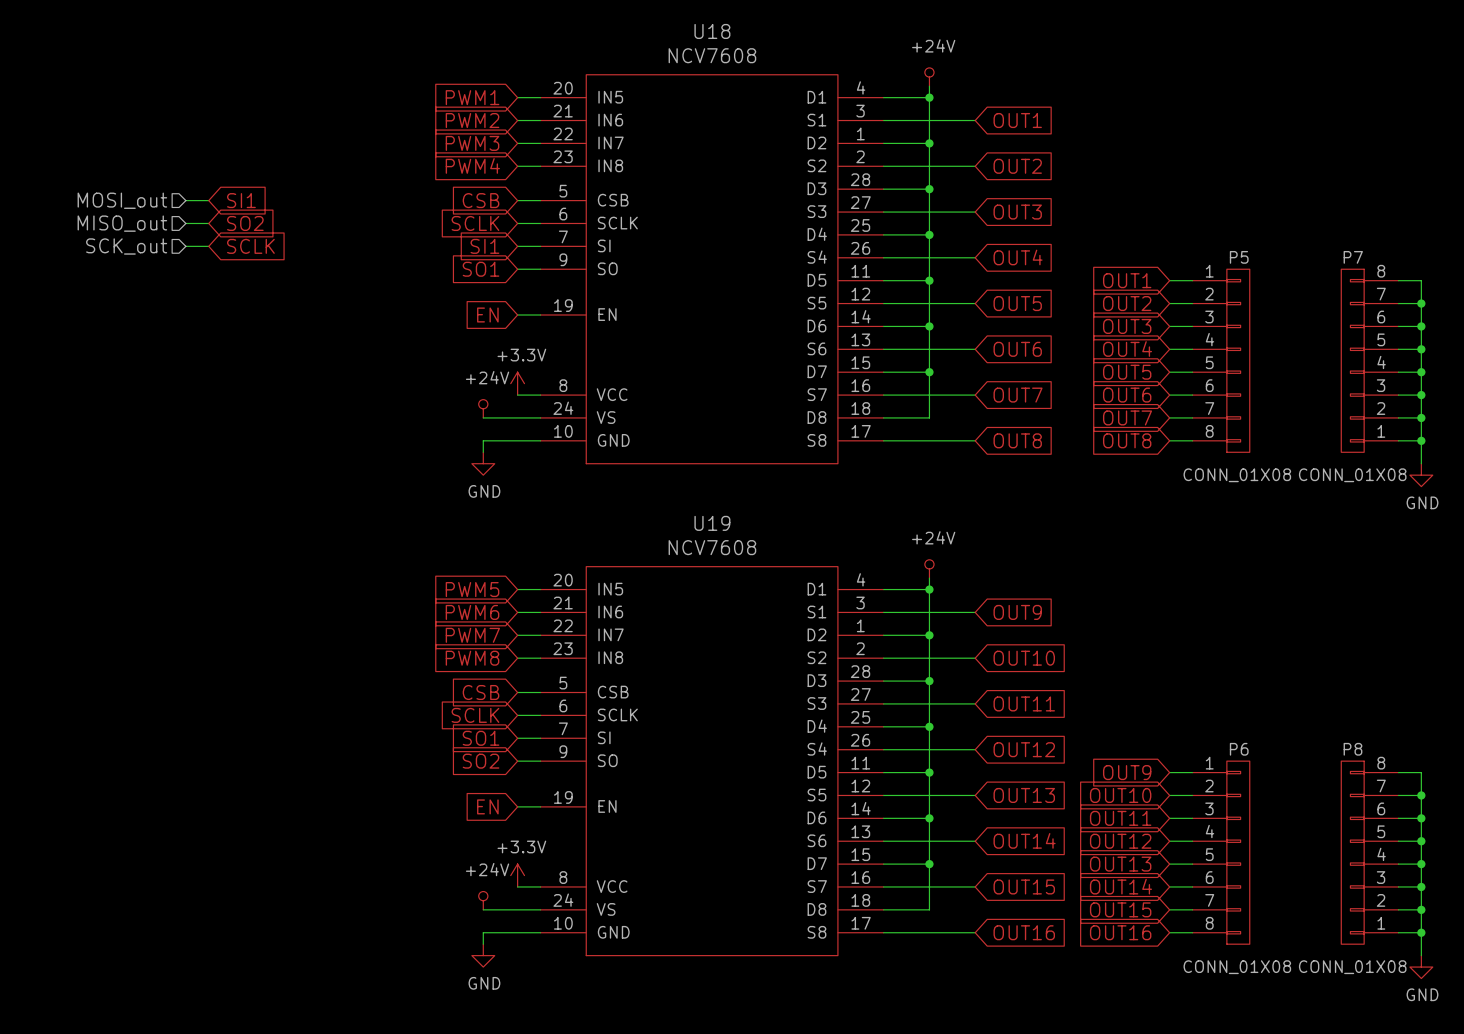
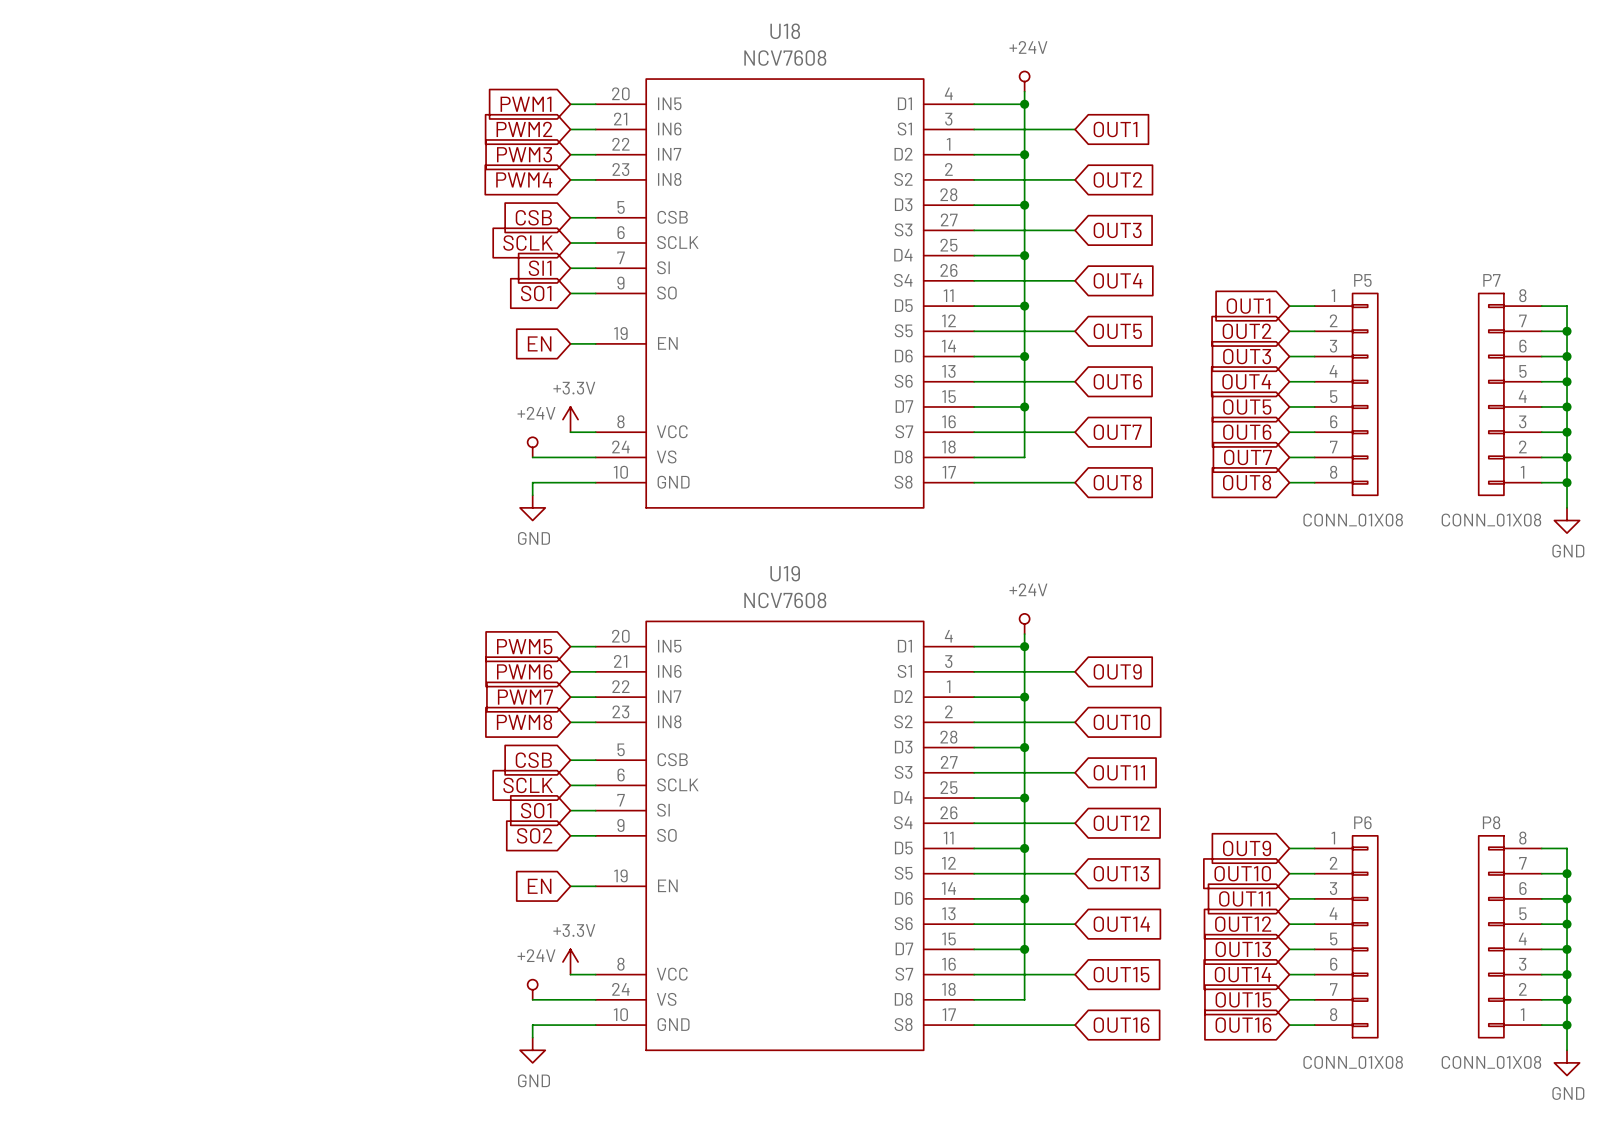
hierarchical label: MOSI_out (122, 200) -> none
wire: (185, 200) (208, 200) -> none
global label: SI1 (241, 200) -> none
hierarchical label: MISO_out (122, 223) -> none
wire: (185, 223) (208, 223) -> none
global label: SO2 (245, 223) -> none
hierarchical label: SCK_out (126, 246) -> none
wire: (185, 246) (208, 246) -> none
global label: SCLK (250, 246) -> none

